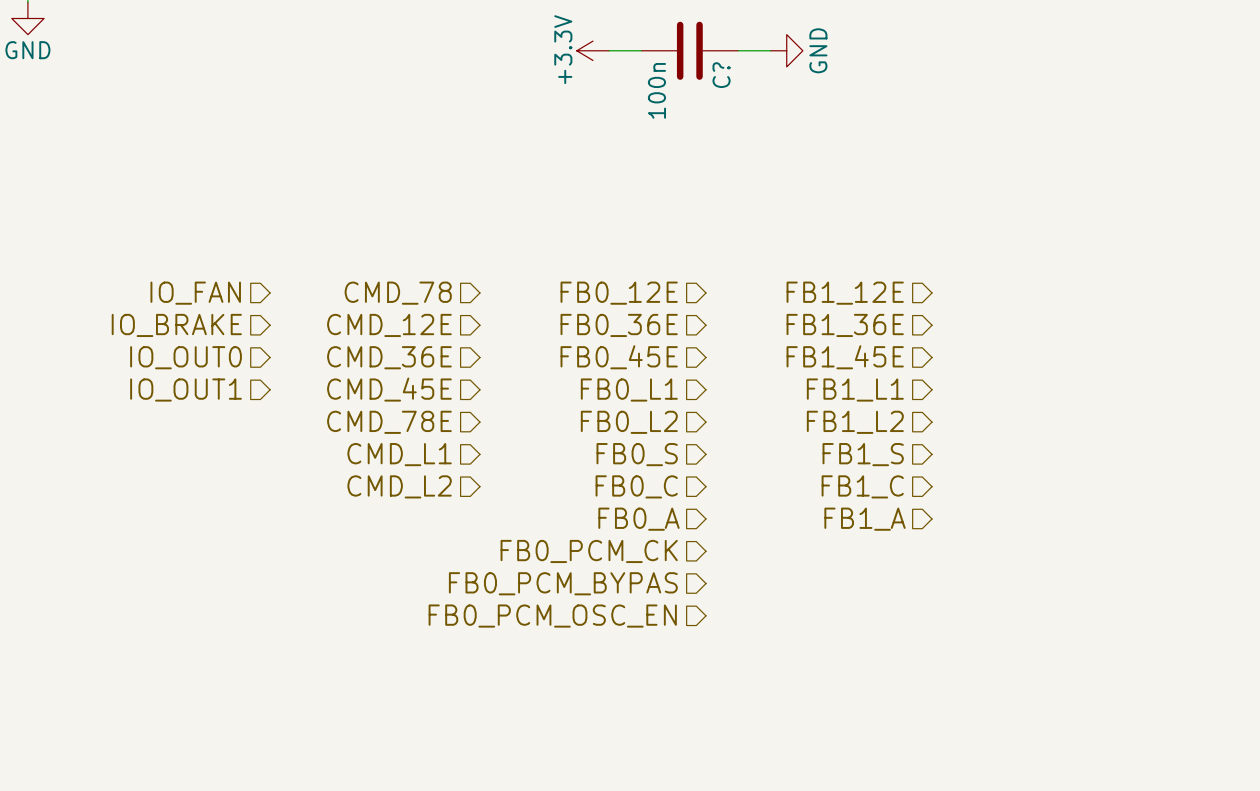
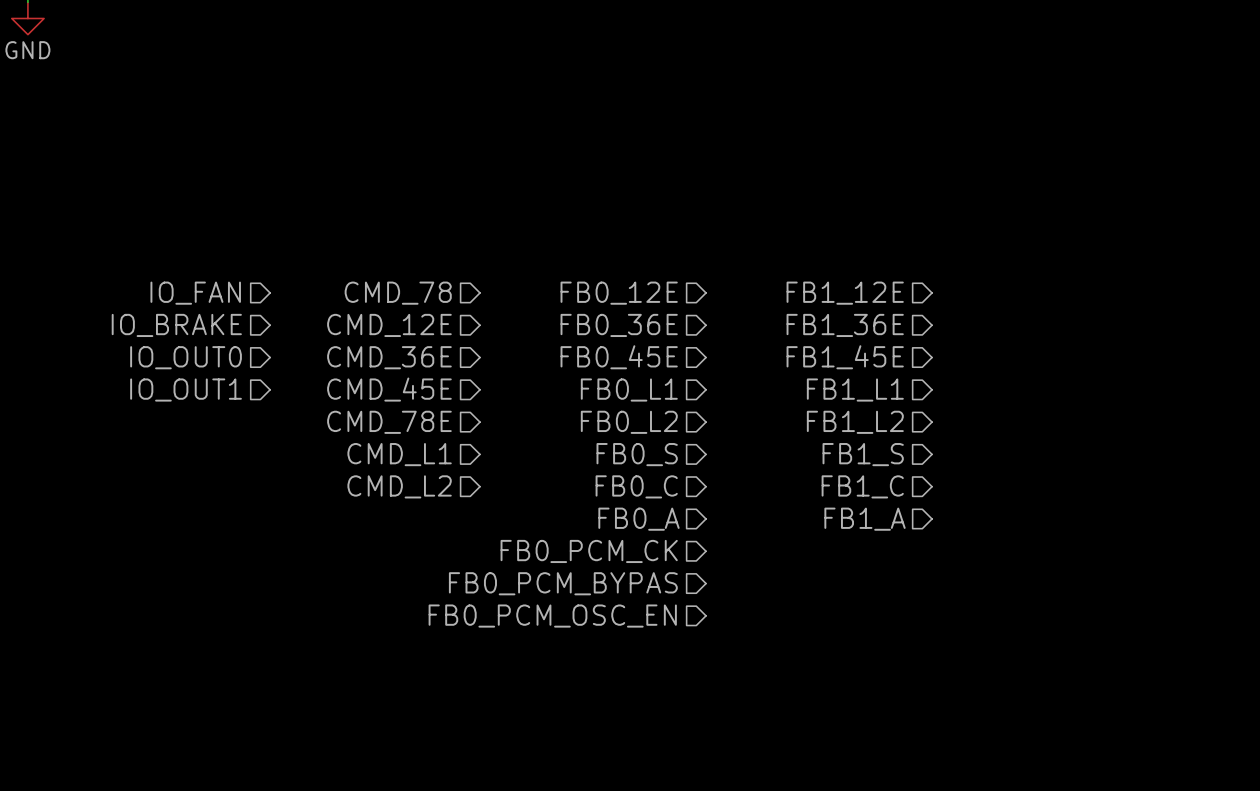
power symbol: +3.3V (592, 50) -> none
wire: (609, 50) (641, 50) -> none
C?: 100n (689, 50) -> none
wire: (738, 50) (770, 50) -> none
power symbol: GND (786, 50) -> none

